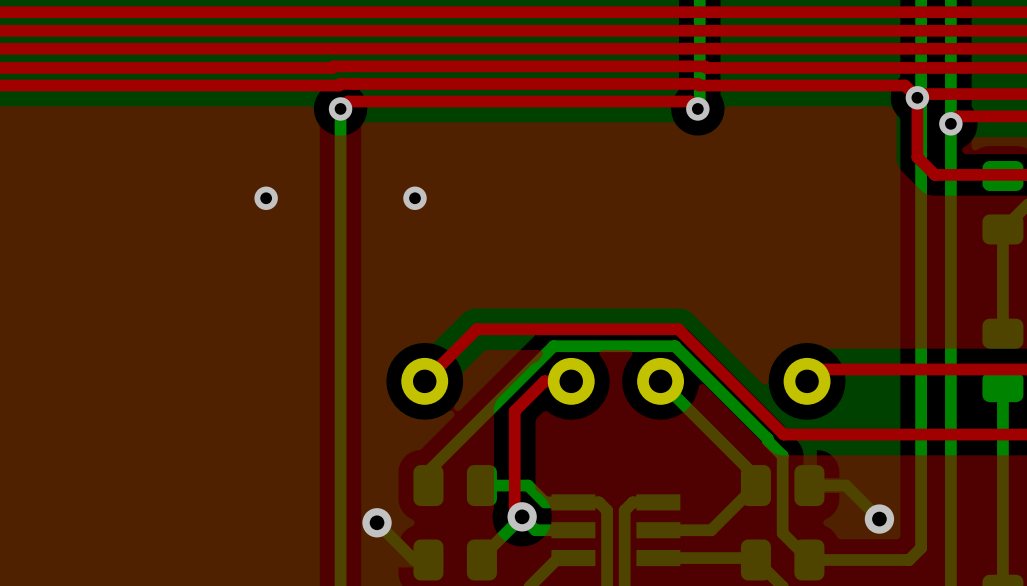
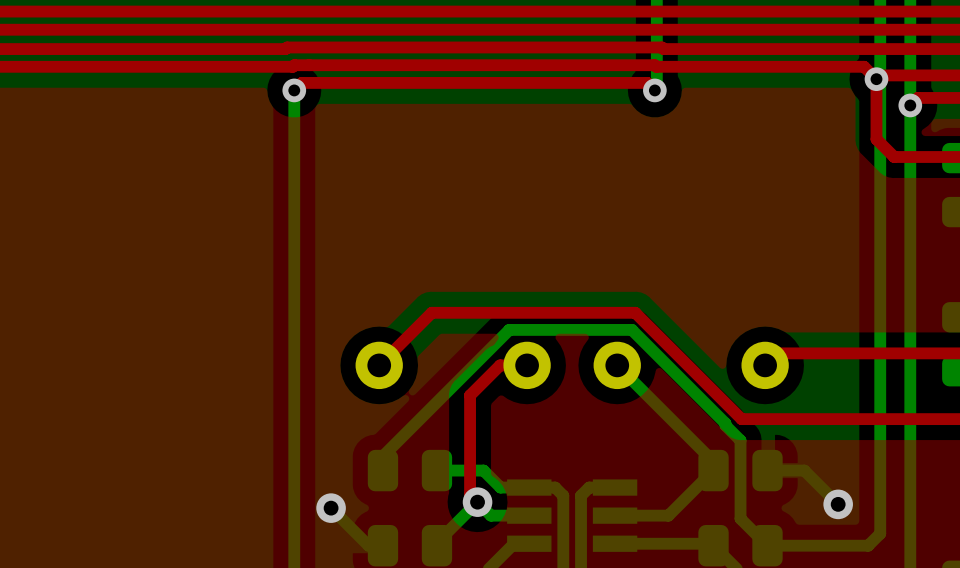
via: (266, 198) -> none
via: (415, 198) -> none

